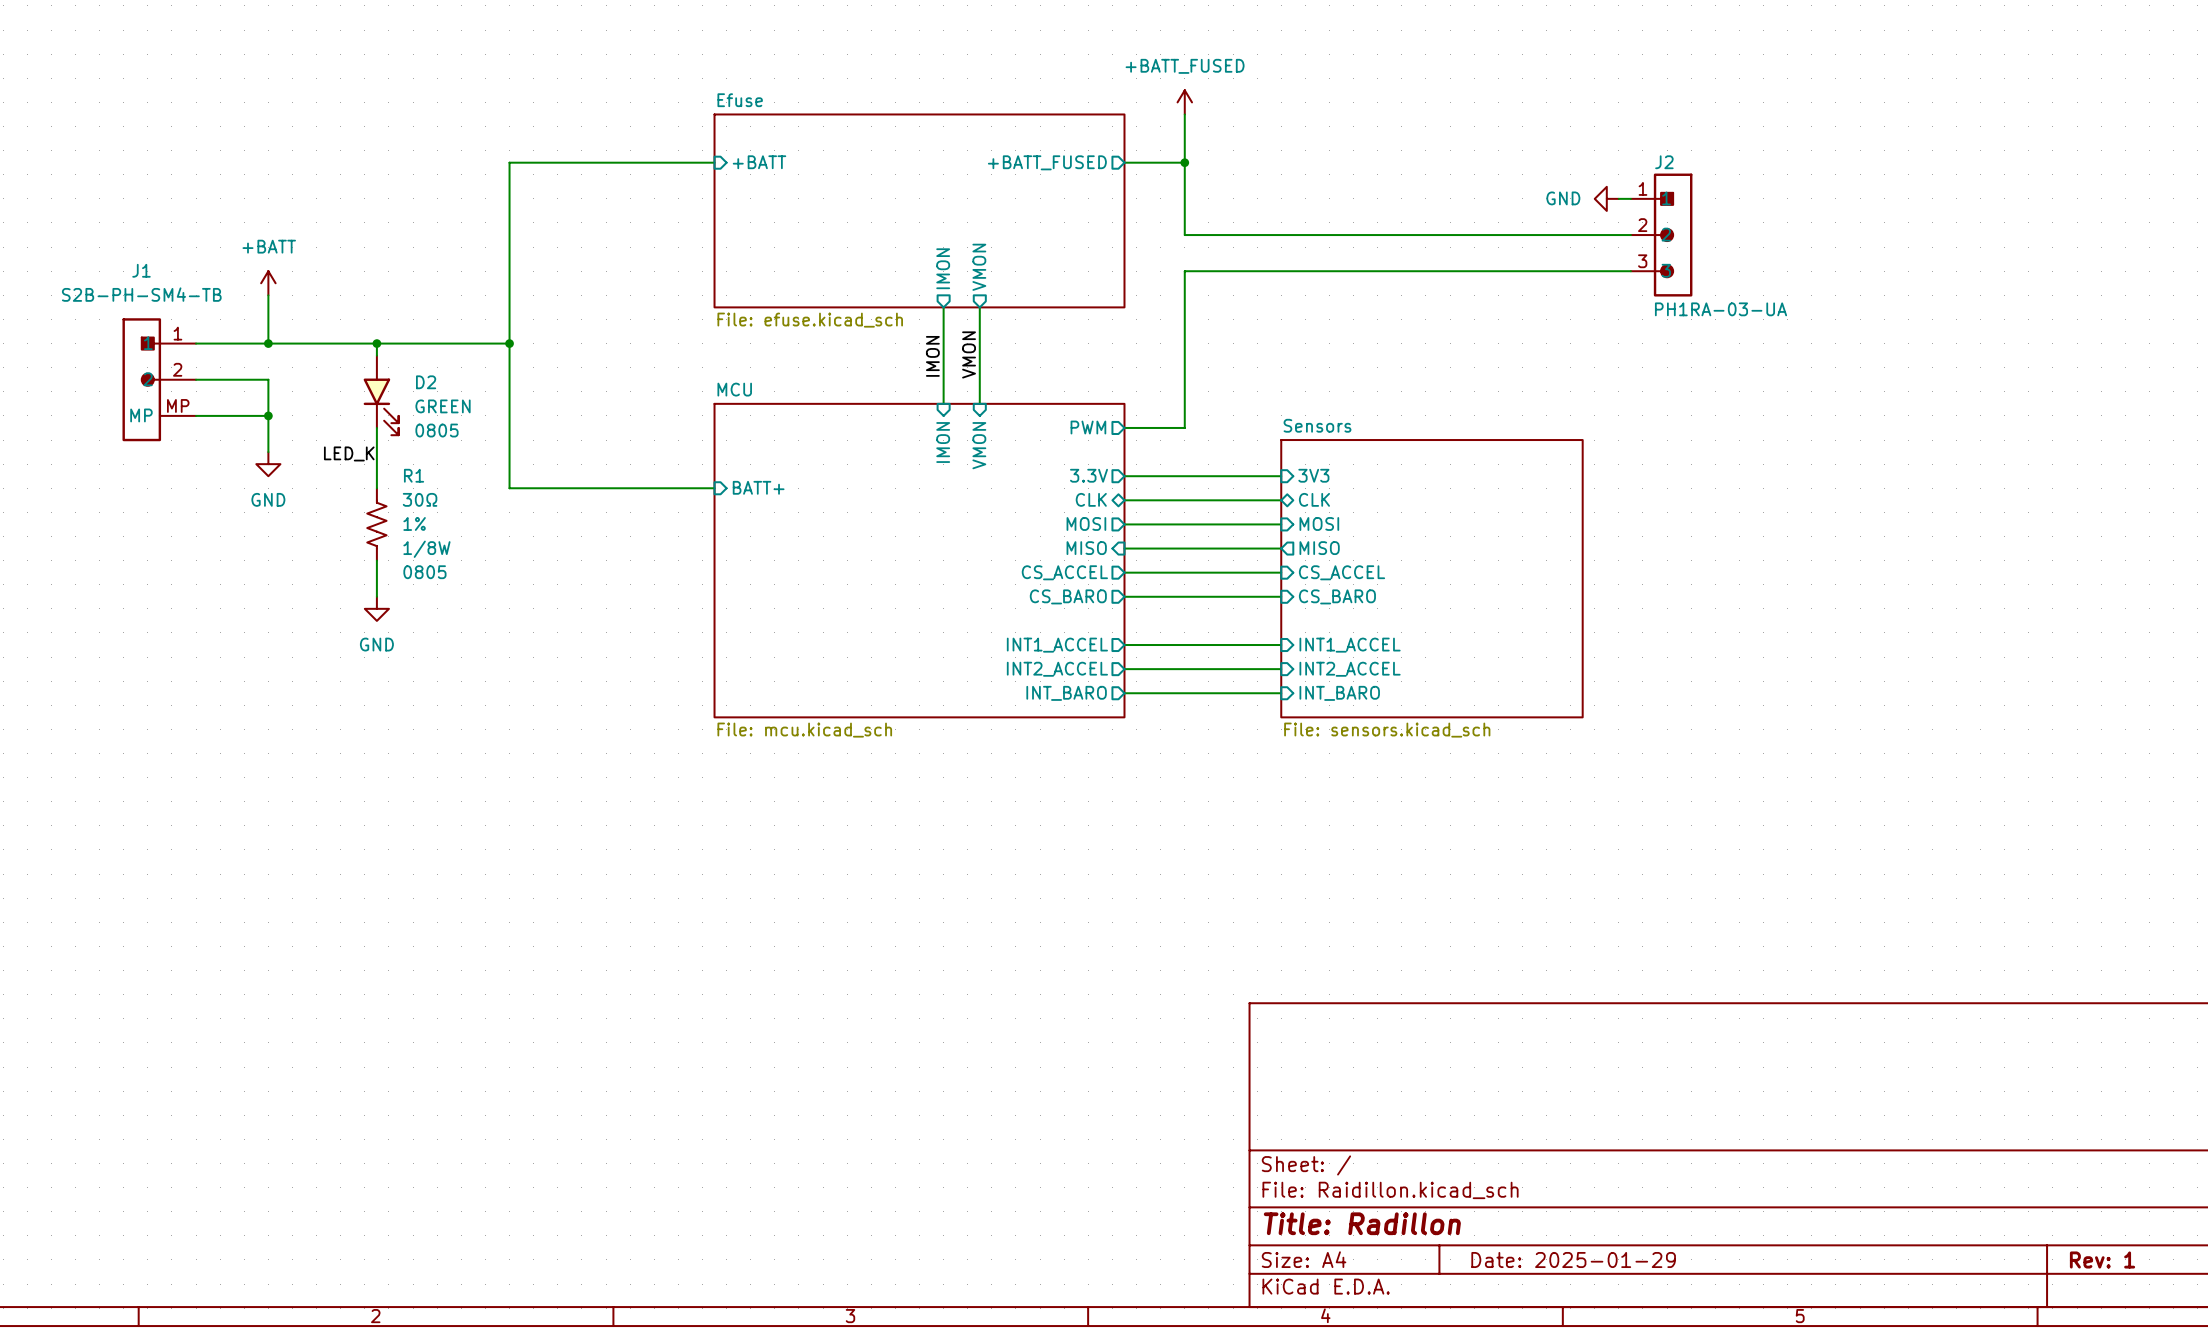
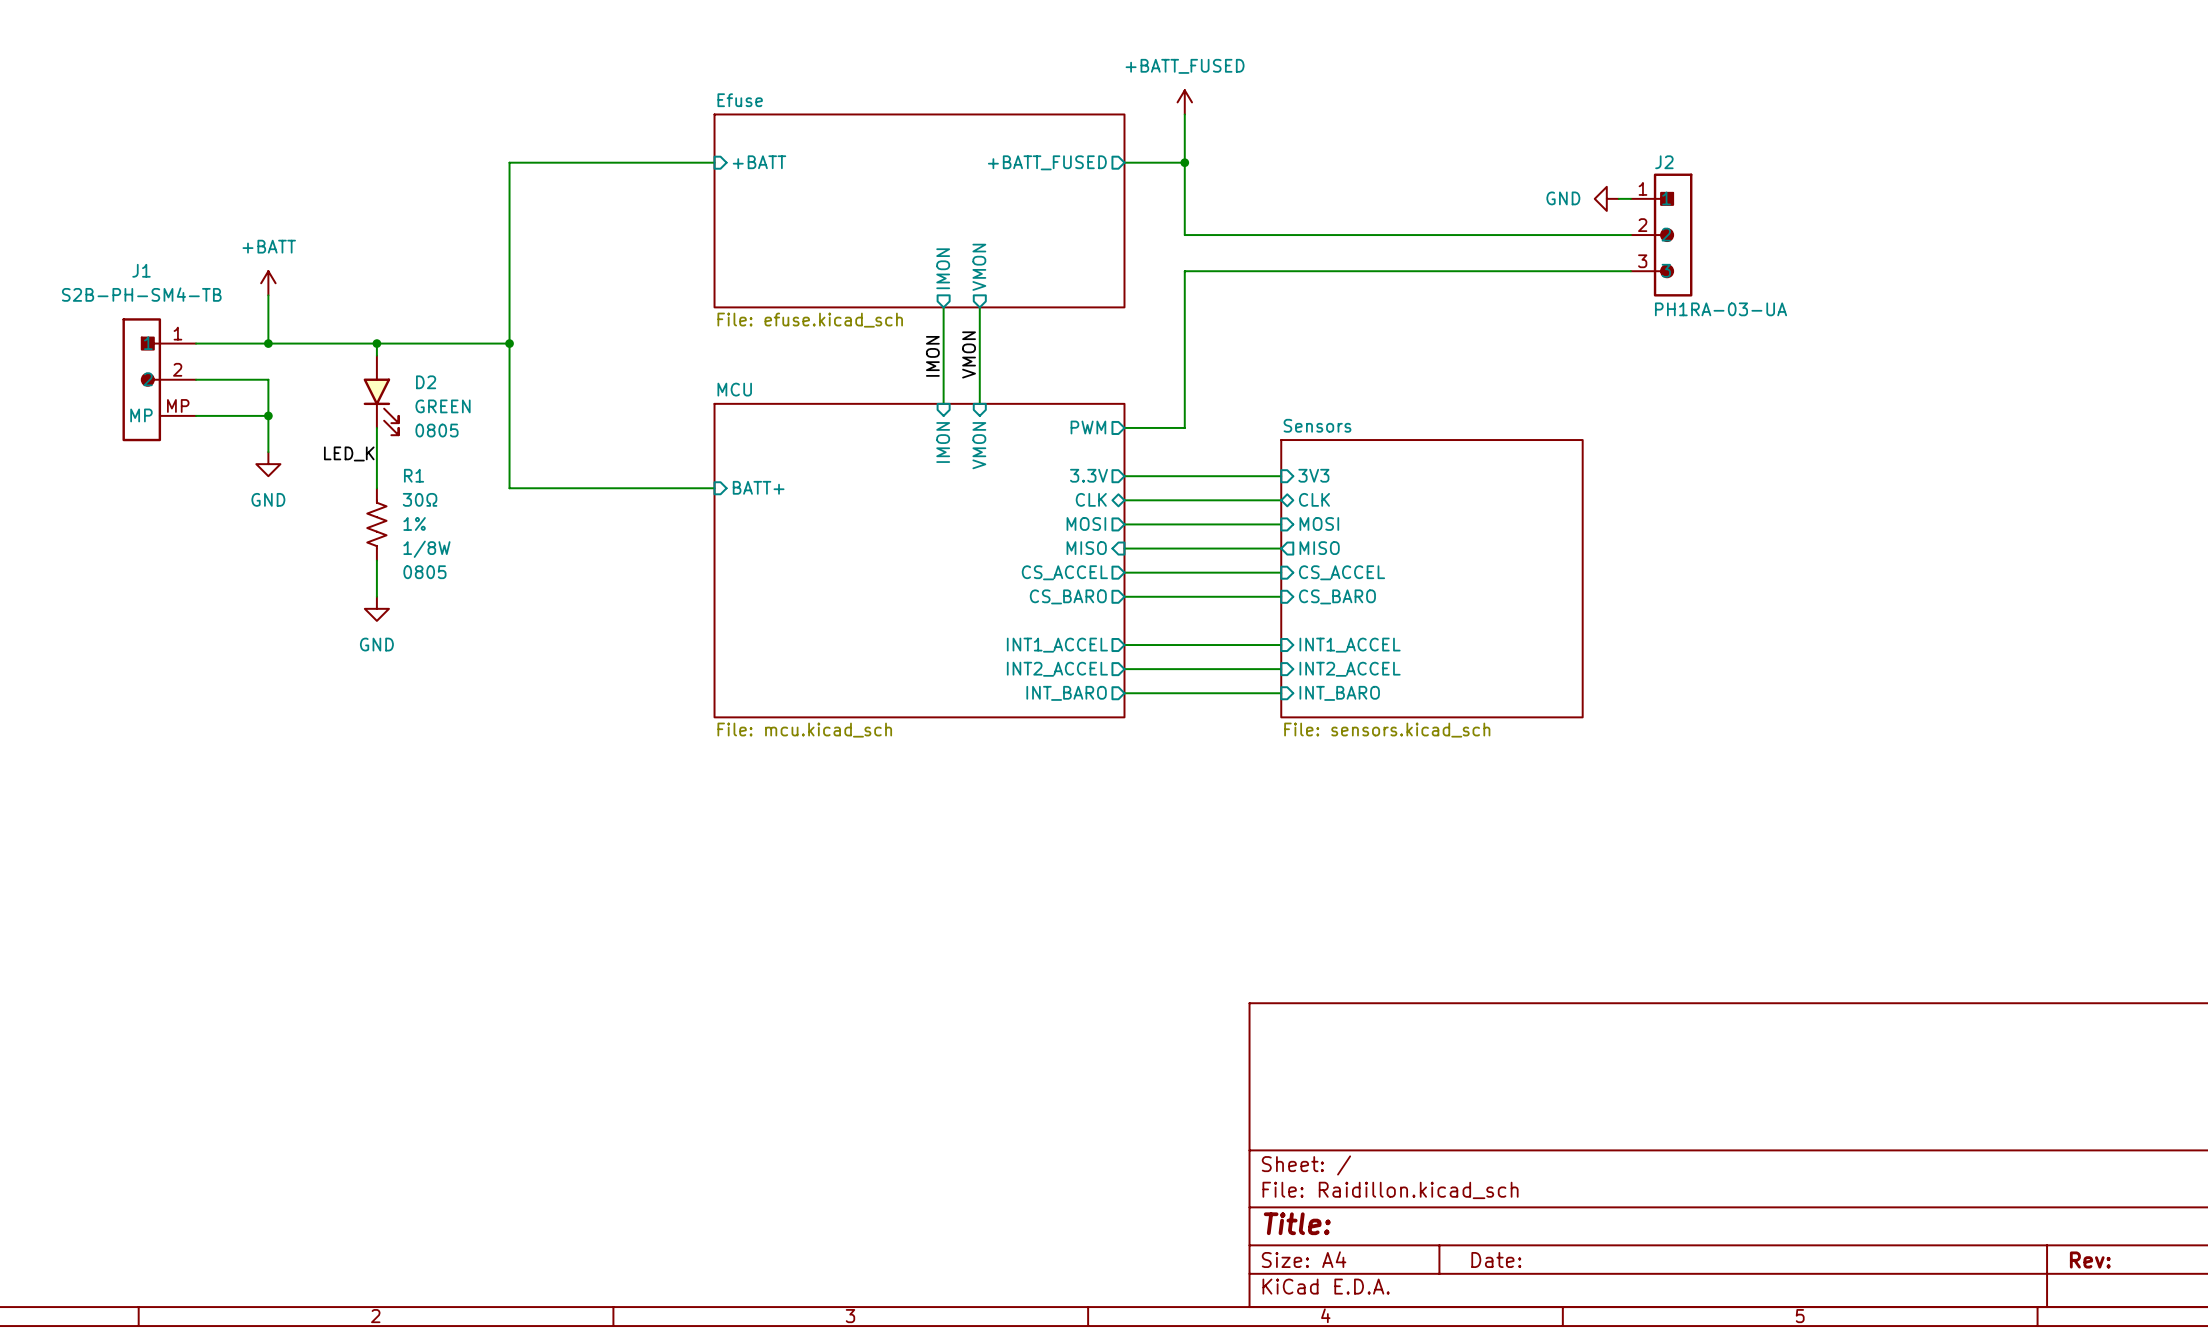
title block: Title: Radillon (1362, 1223) -> Title: (1297, 1223)
title block: Date: 2025-01-29 (1573, 1260) -> Date: (1496, 1260)
title block: Rev: 1 (2102, 1260) -> Rev: (2090, 1260)

